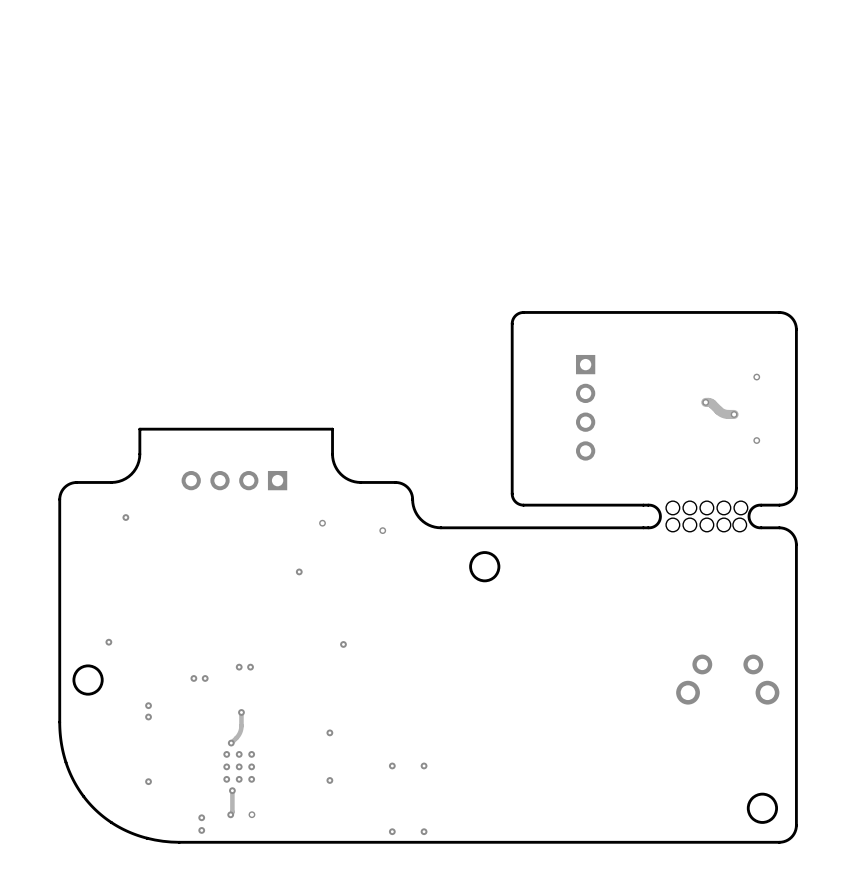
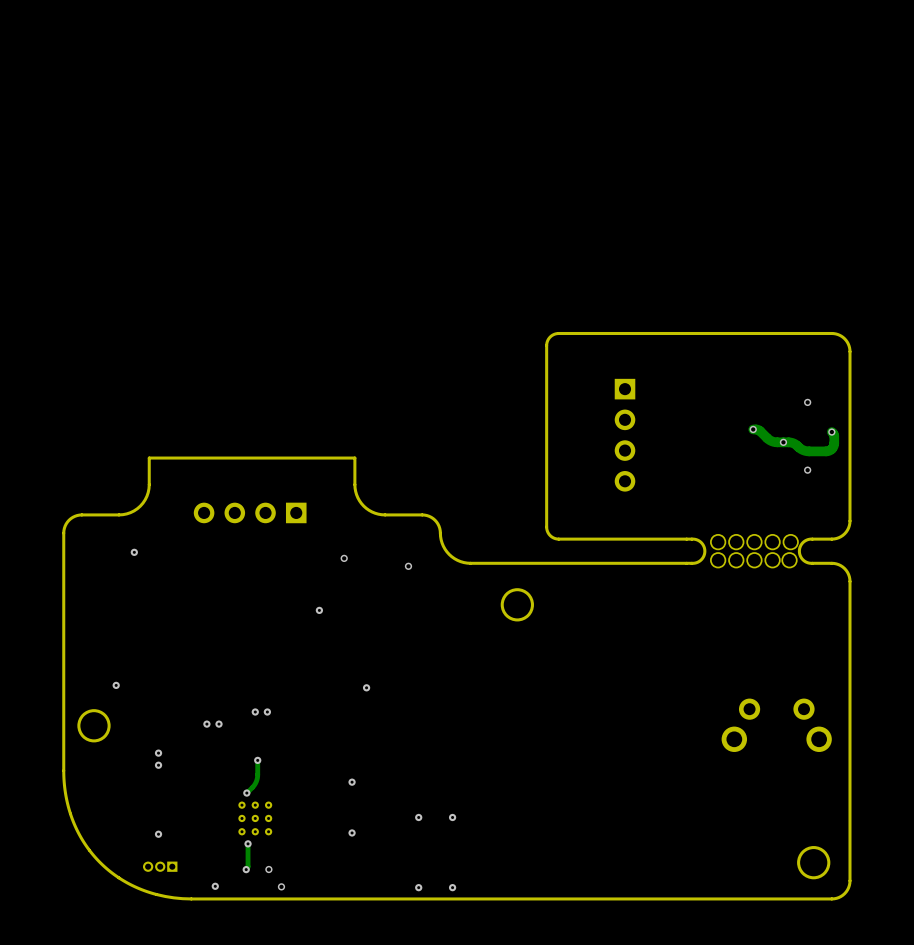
track: none -> (831, 432) (834, 435) (834, 444) (828, 451) (807, 451) (793, 443) (783, 442)
via: none -> (831, 432)
part: none -> (160, 866)
via: (201, 817) -> none
via: none -> (281, 886)

